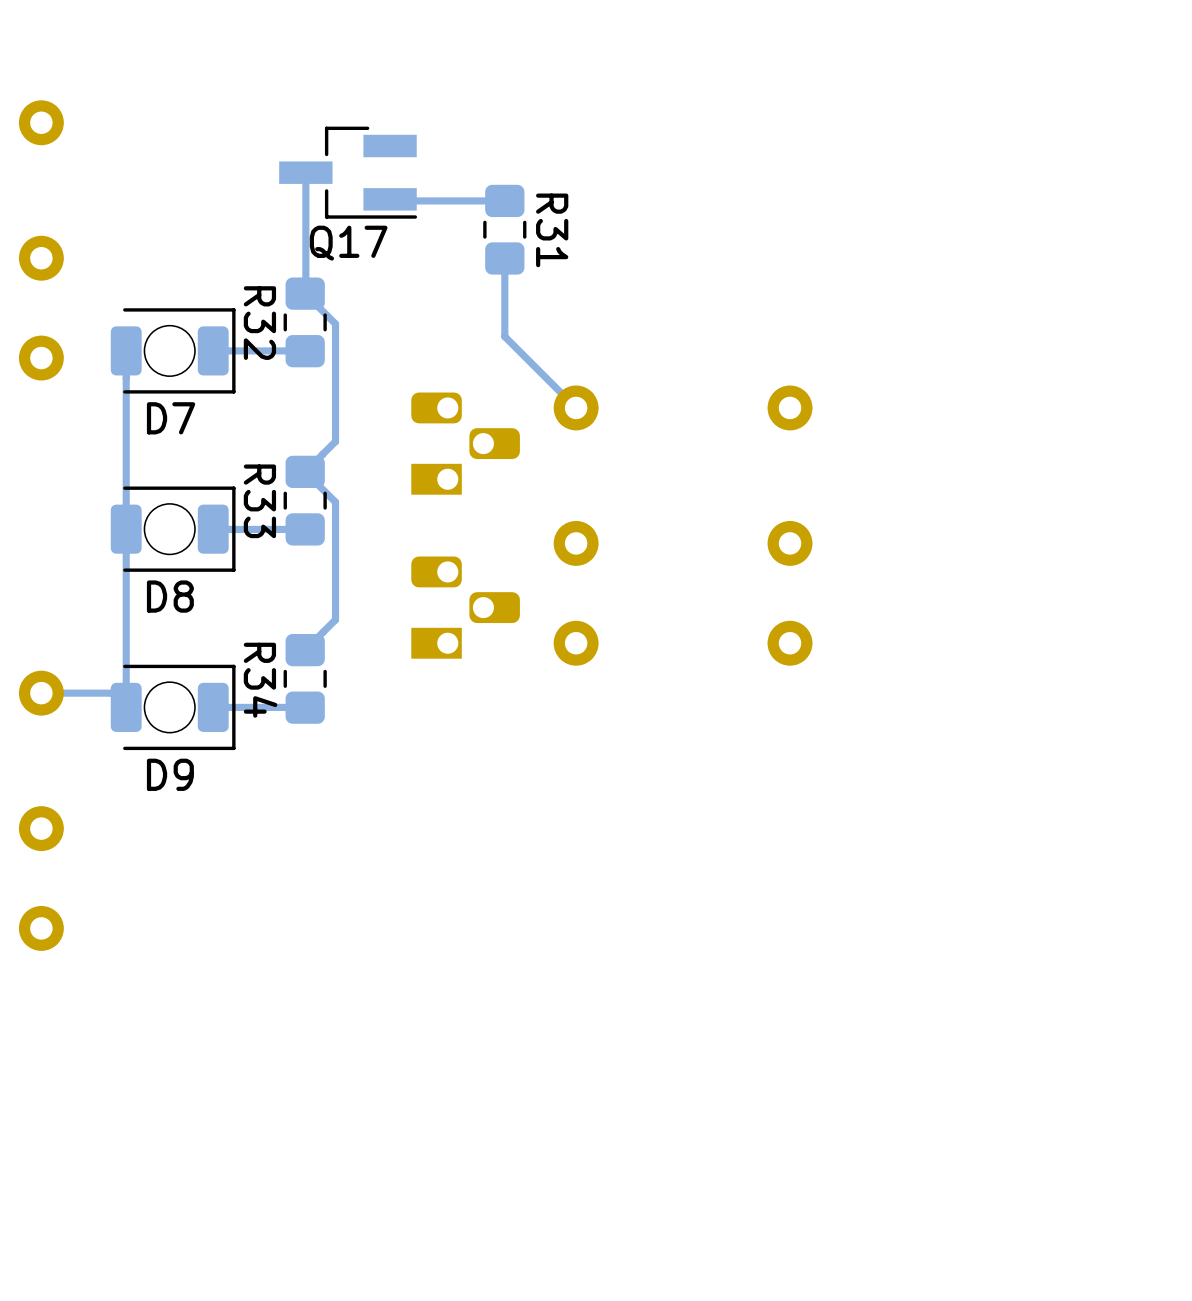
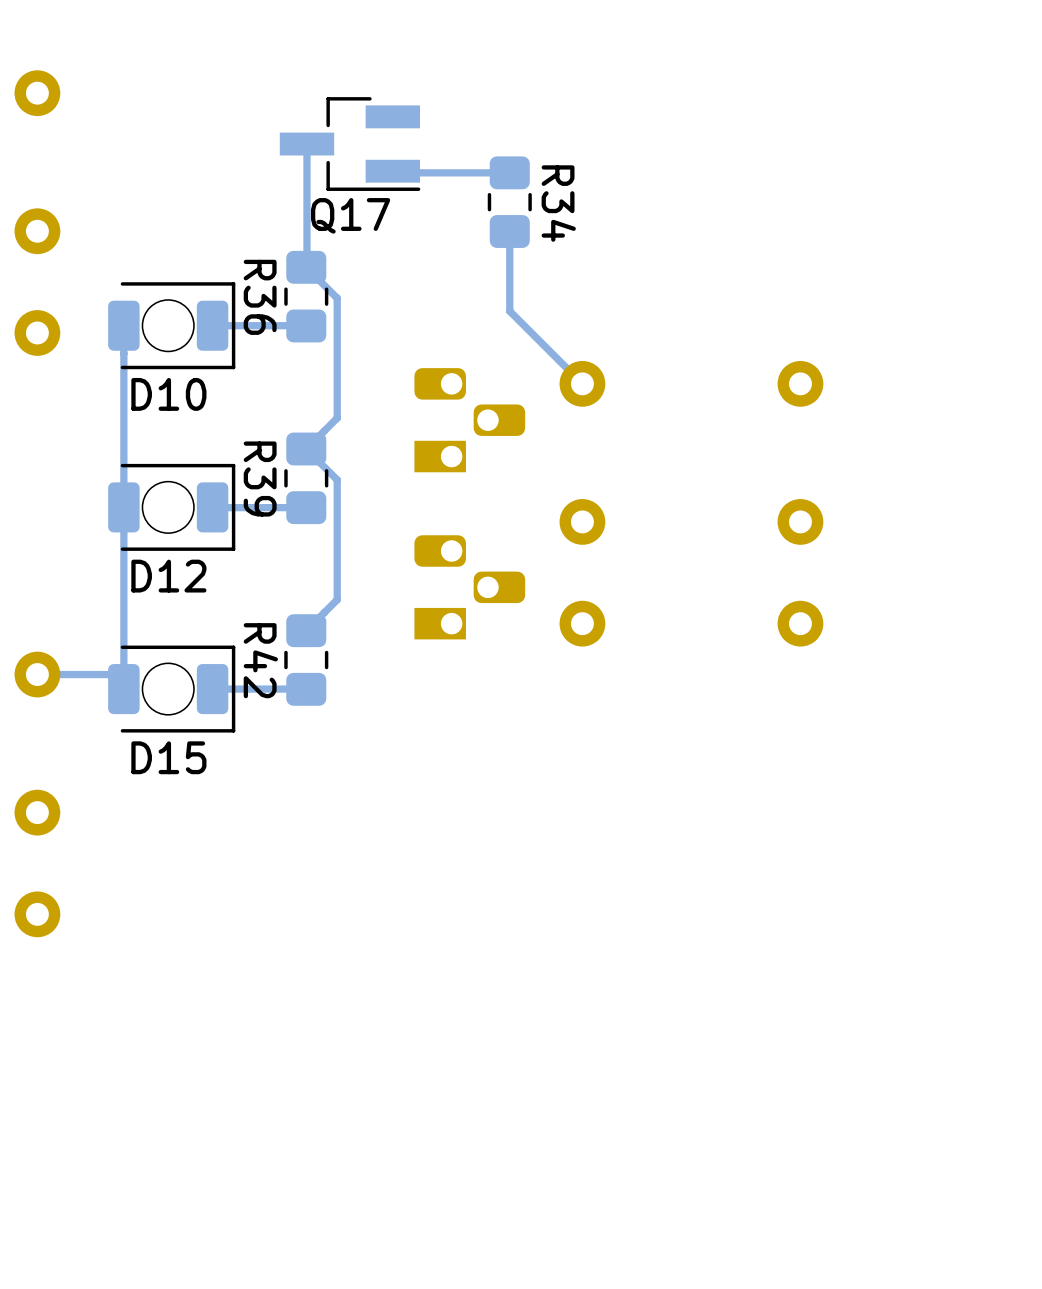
R31 name: R31 (552, 230) -> R34 (558, 203)
R32 name: R32 (259, 323) -> R36 (260, 297)
D7 name: D7 (171, 418) -> D10 (168, 394)
R33 name: R33 (259, 501) -> R39 (260, 479)
D8 name: D8 (170, 596) -> D12 (168, 576)
R34 name: R34 (260, 680) -> R42 (260, 660)
D9 name: D9 (170, 774) -> D15 (168, 757)

